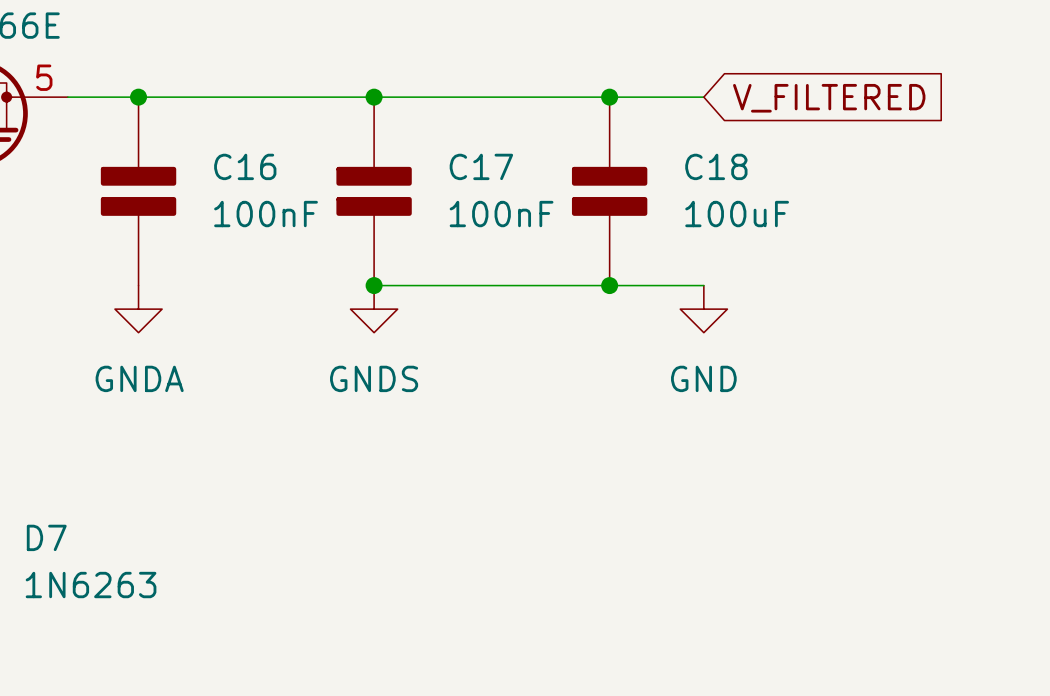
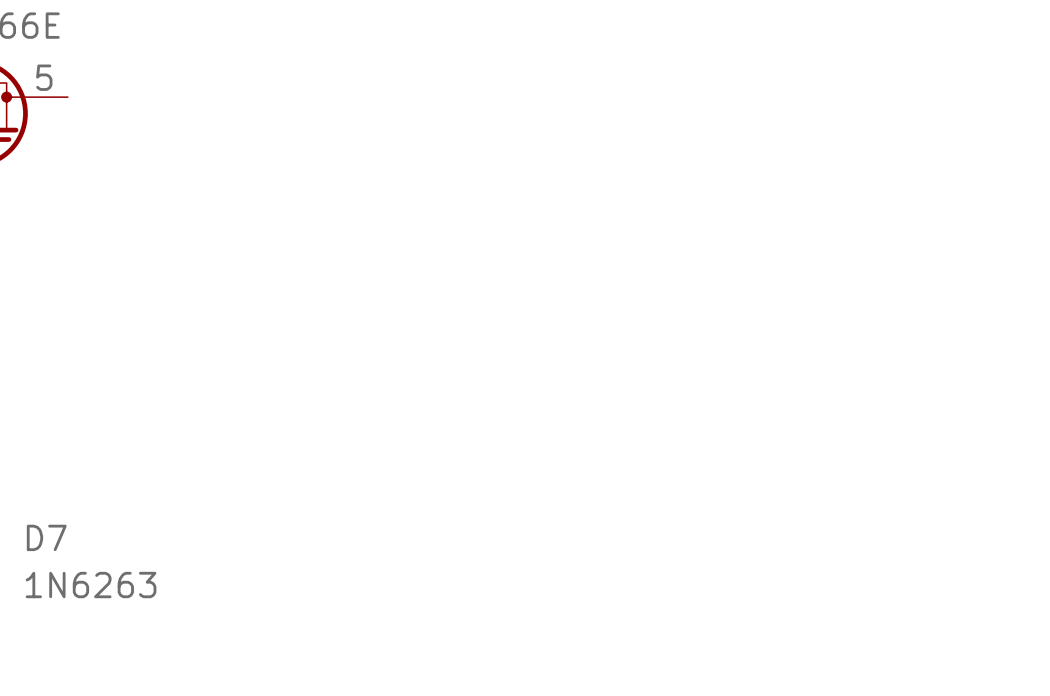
wire: (67, 97) (703, 97) -> none
junction: (138, 97) -> none
junction: (374, 97) -> none
junction: (609, 97) -> none
global label: V_FILTERED (829, 98) -> none
C16: 100nF (138, 191) -> none
C17: 100nF (374, 191) -> none
C18: 100uF (609, 191) -> none
wire: (374, 285) (703, 285) -> none
junction: (374, 285) -> none
junction: (609, 285) -> none
power symbol: GNDA (138, 309) -> none
power symbol: GNDS (374, 309) -> none
power symbol: GND (703, 309) -> none

